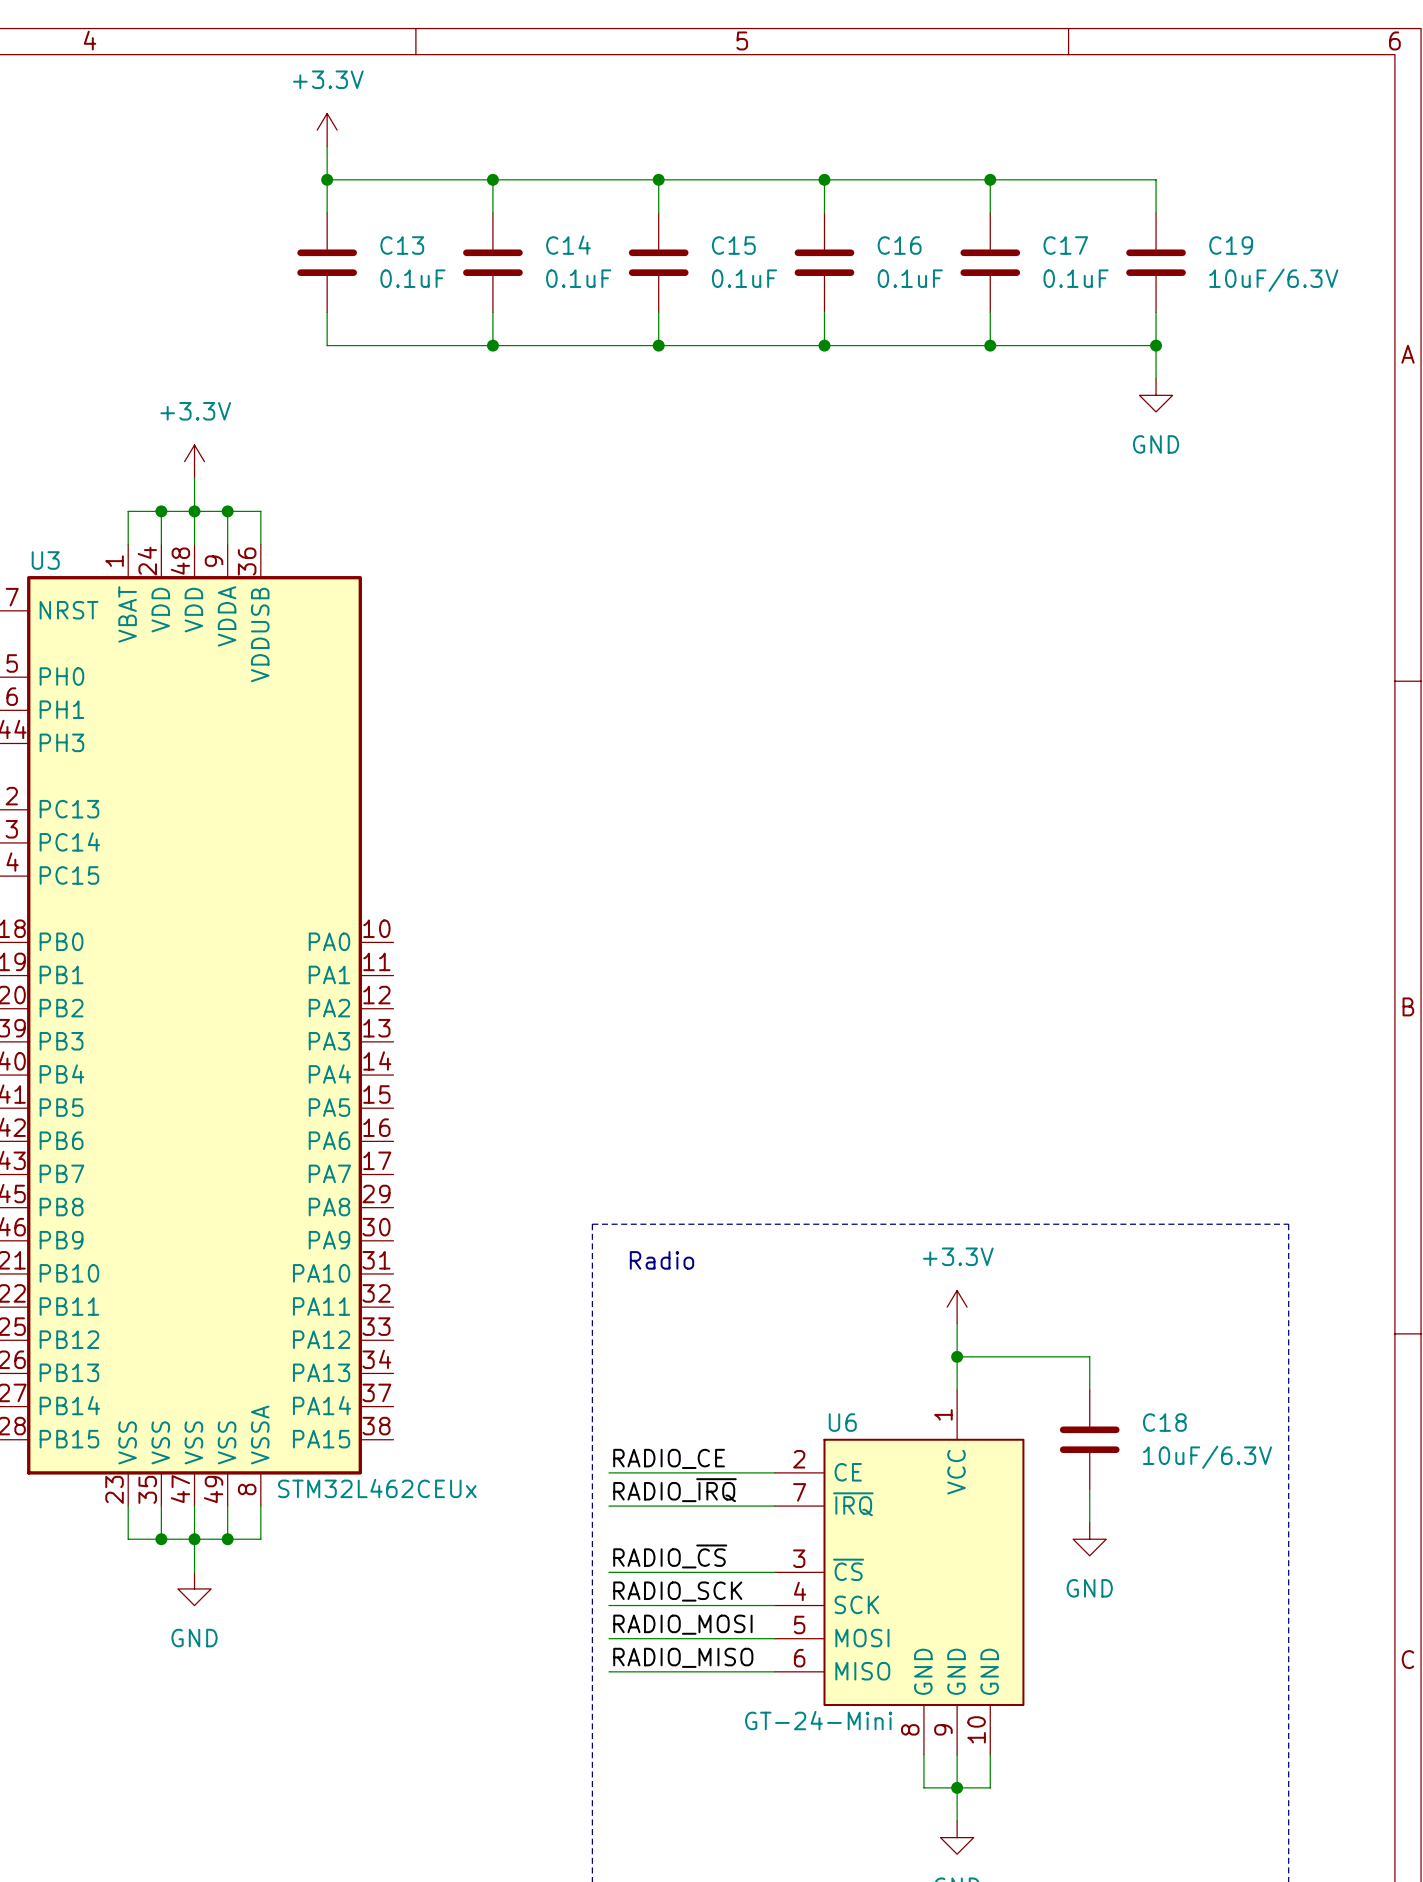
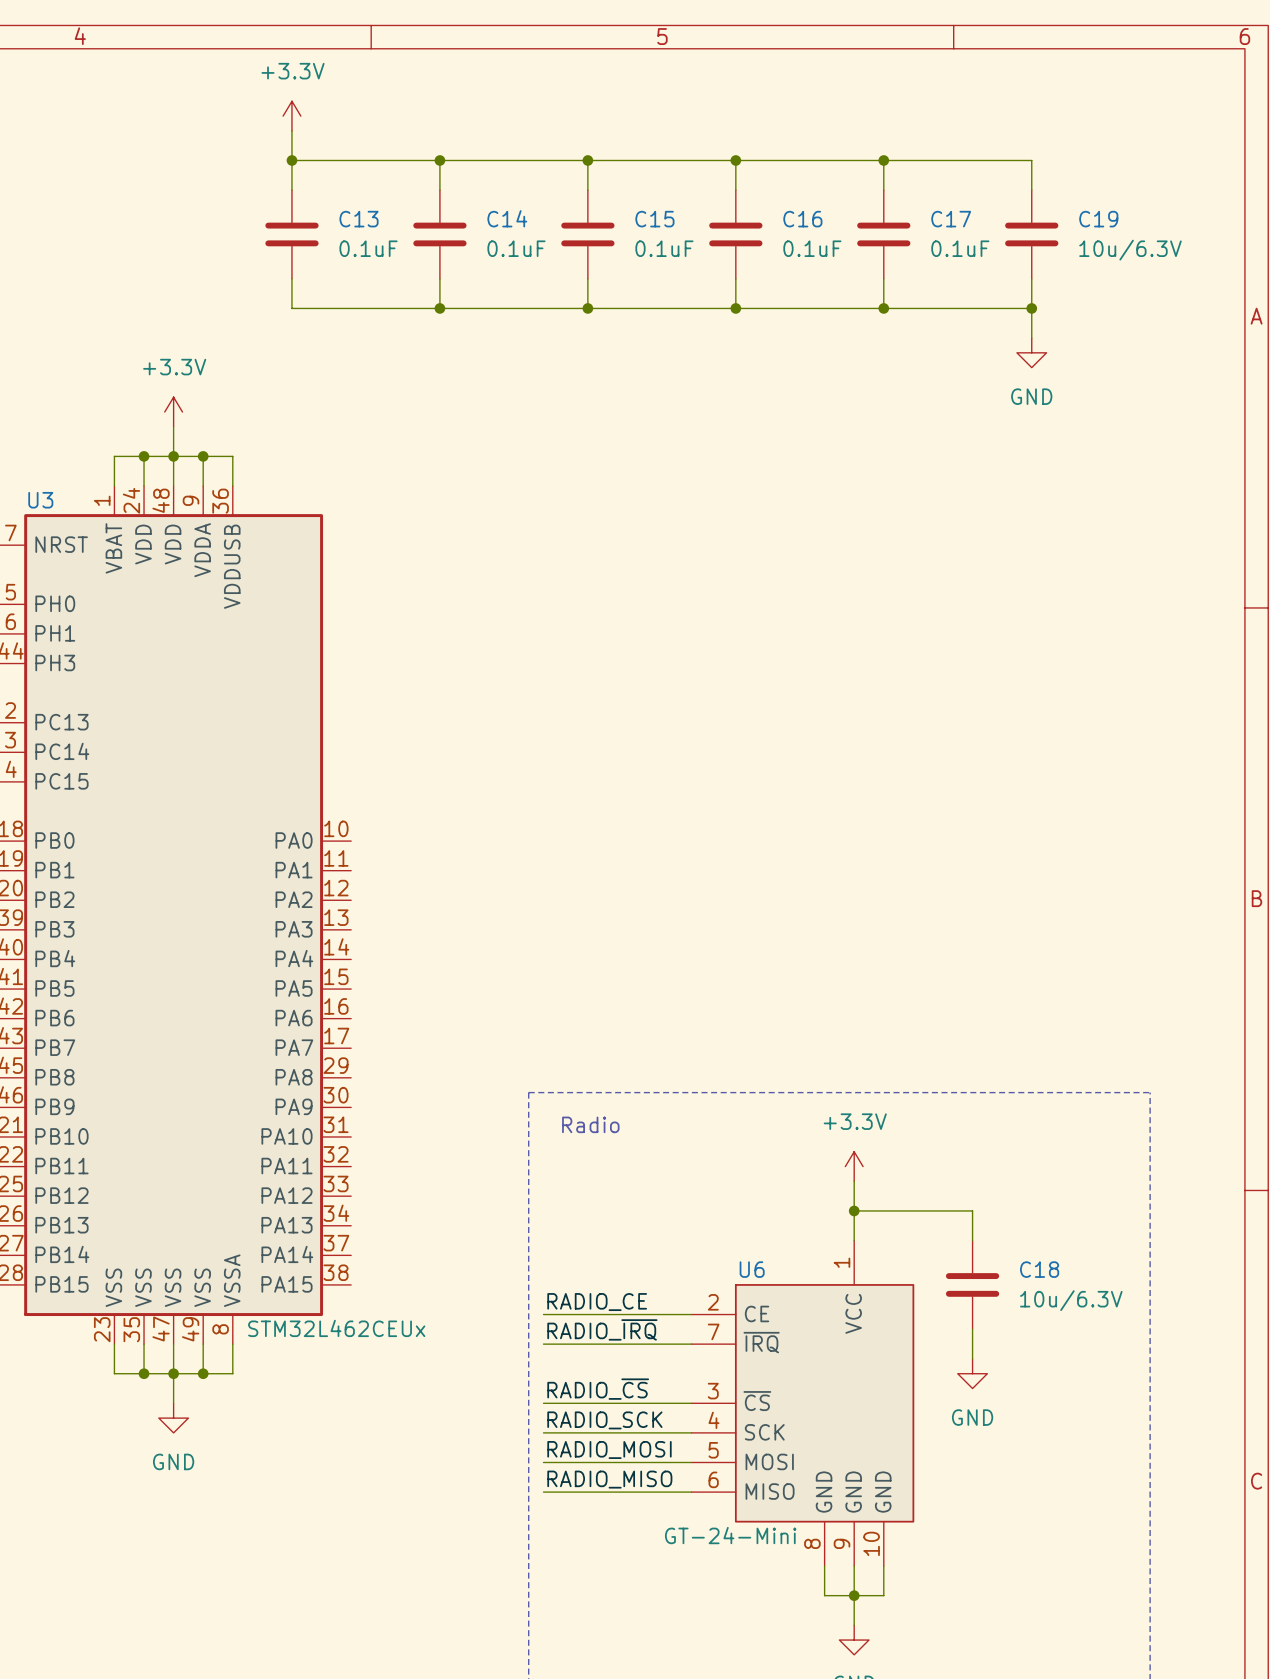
C19 value: 10uF/6.3V (1273, 280) -> 10u/6.3V (1130, 250)
C18 value: 10uF/6.3V (1207, 1457) -> 10u/6.3V (1071, 1300)

